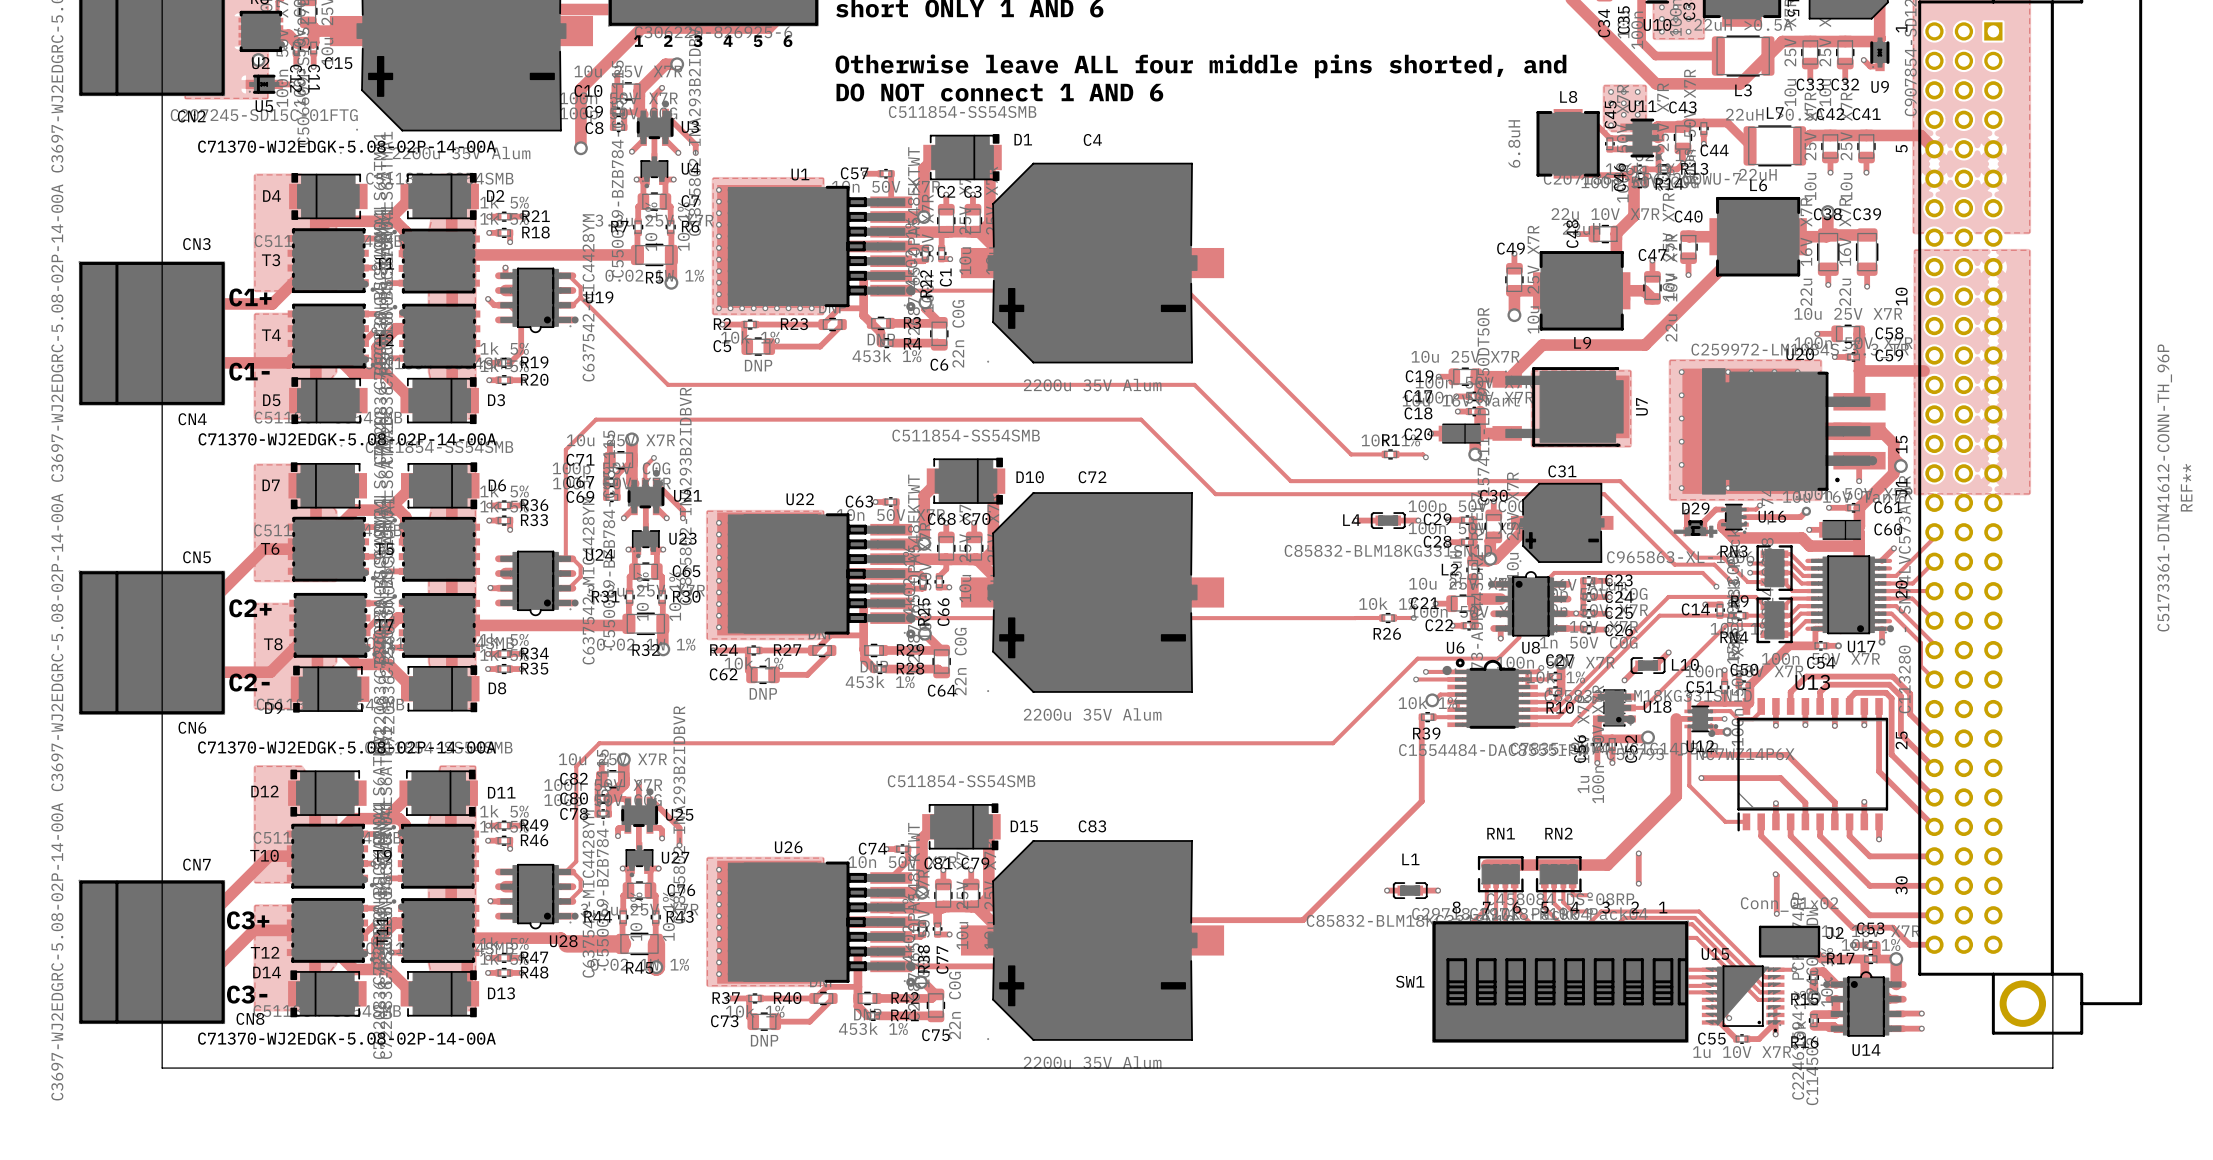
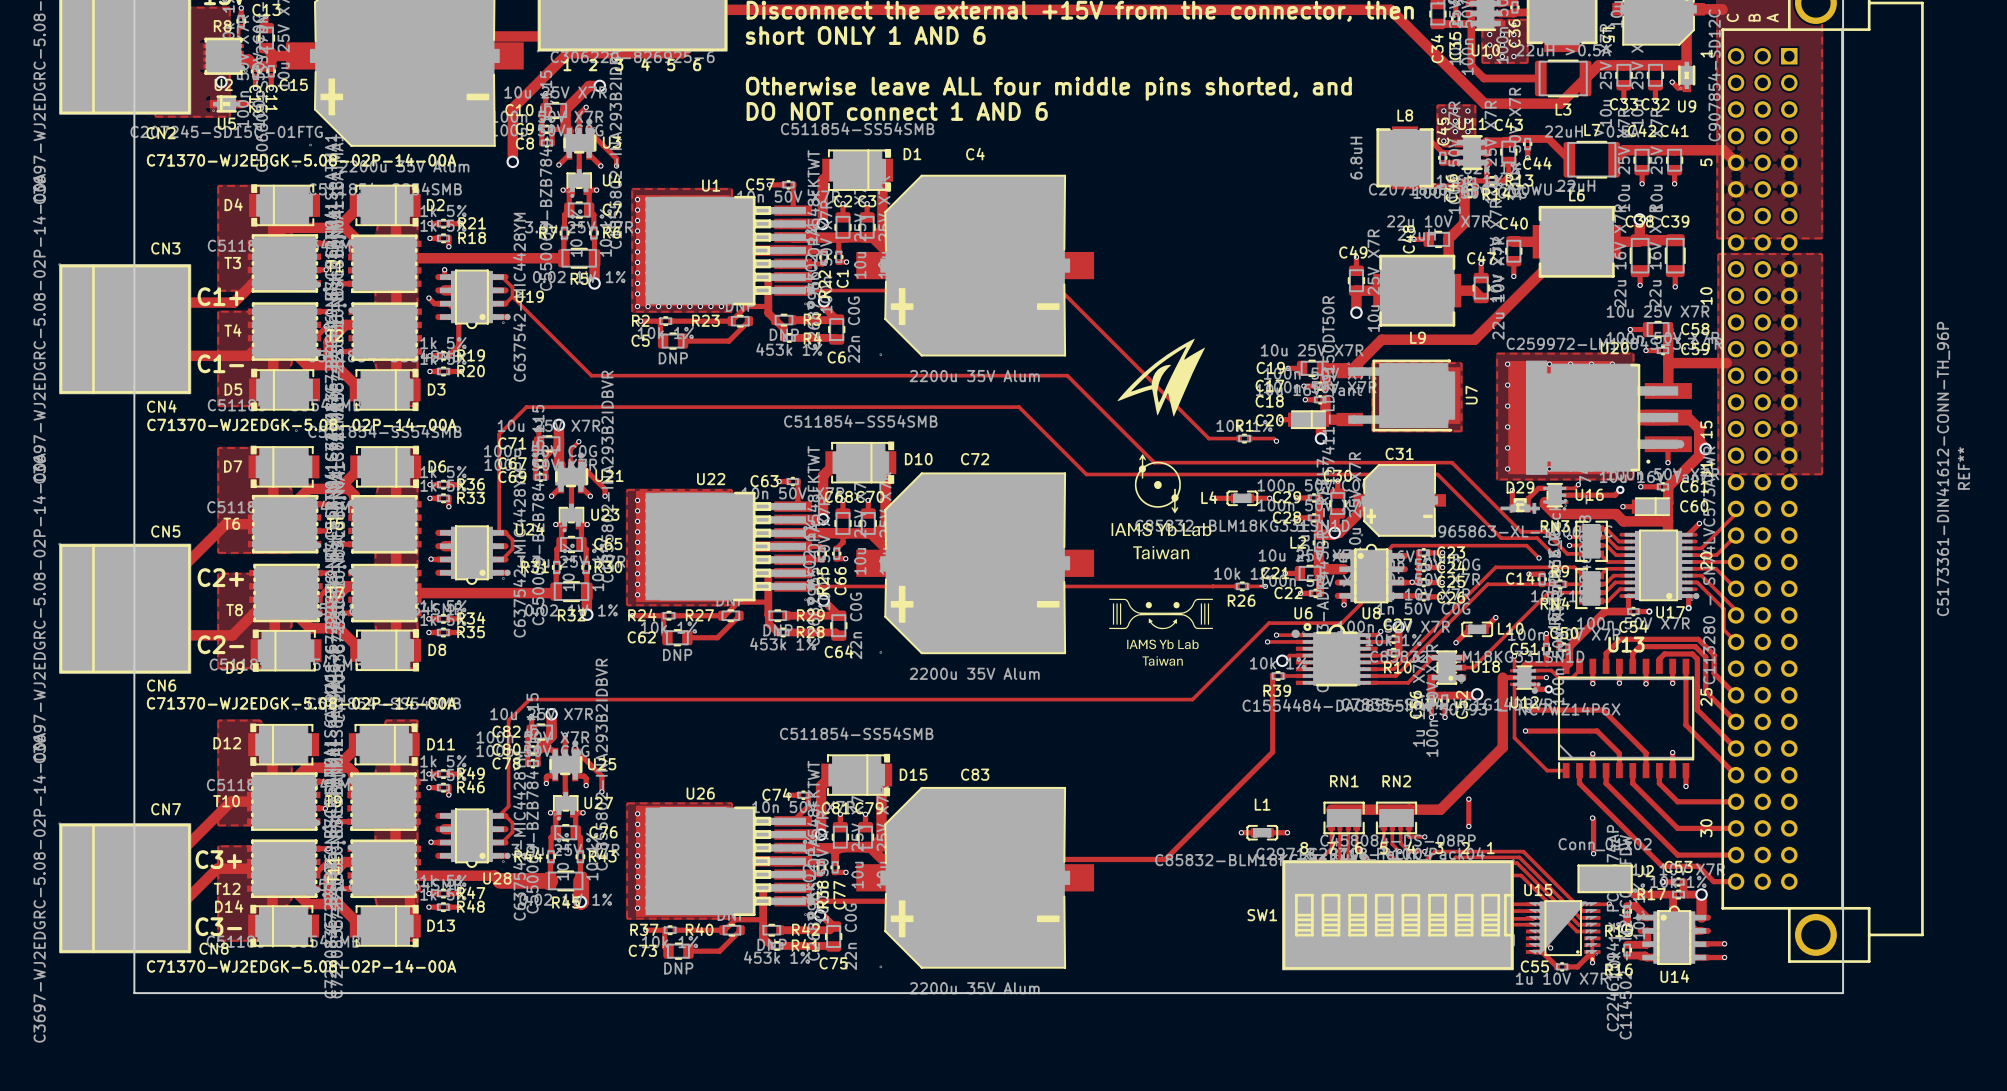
drawing: none -> [1117, 338, 1206, 417]
drawing: none -> [1111, 454, 1212, 560]
drawing: none -> [1109, 598, 1213, 666]

